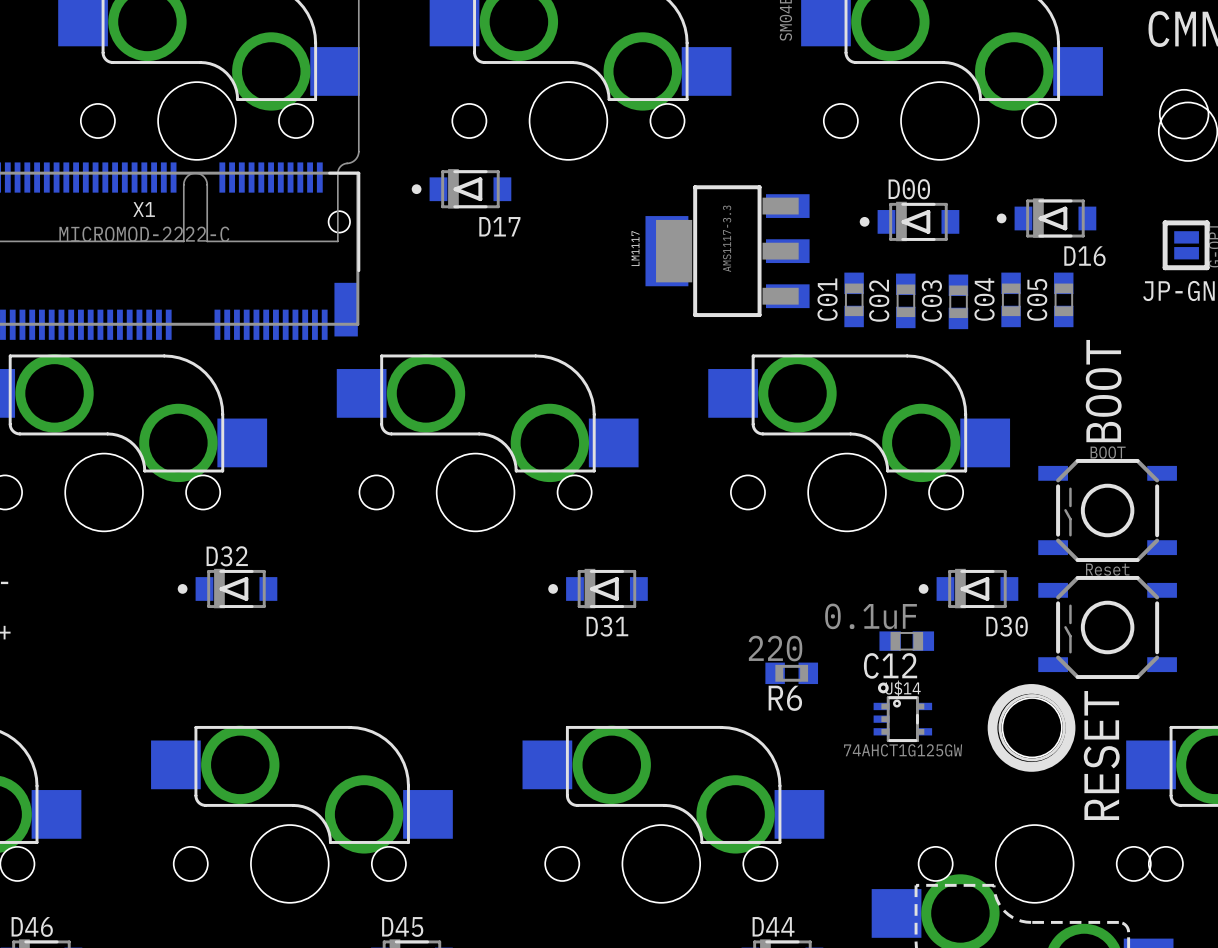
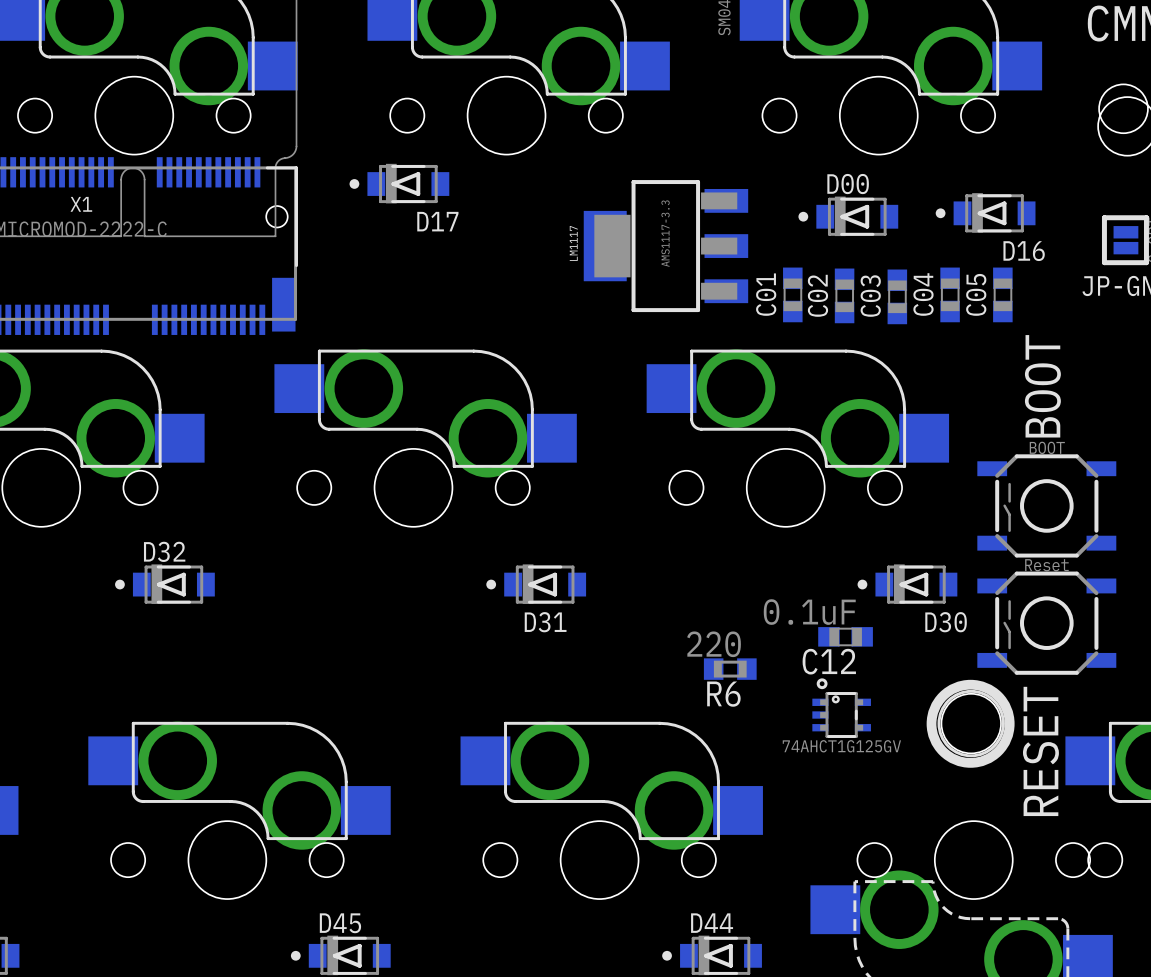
U$14 name: U$14 (903, 688) -> none
U$14 value: 74AHCT1G125GW (903, 750) -> 74AHCT1G125GV (841, 746)

